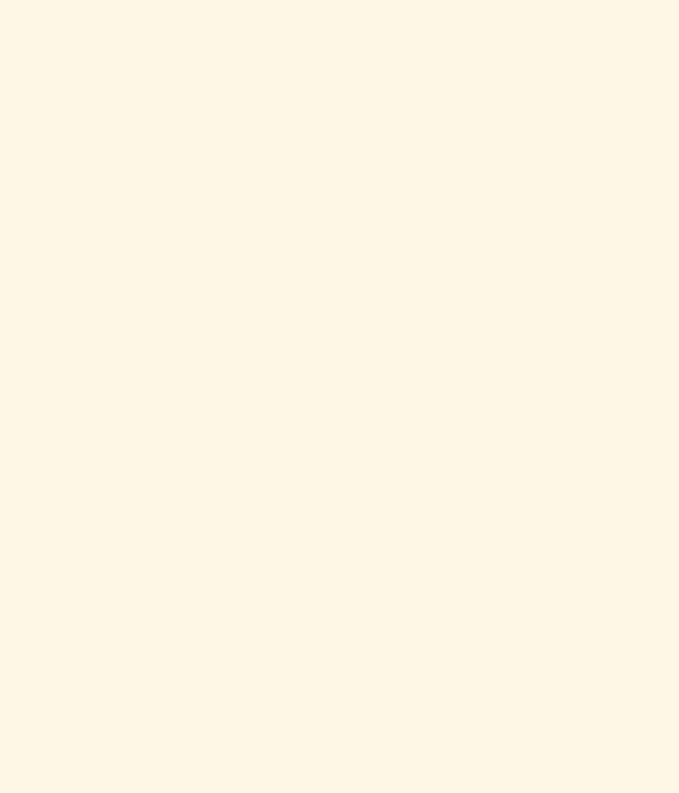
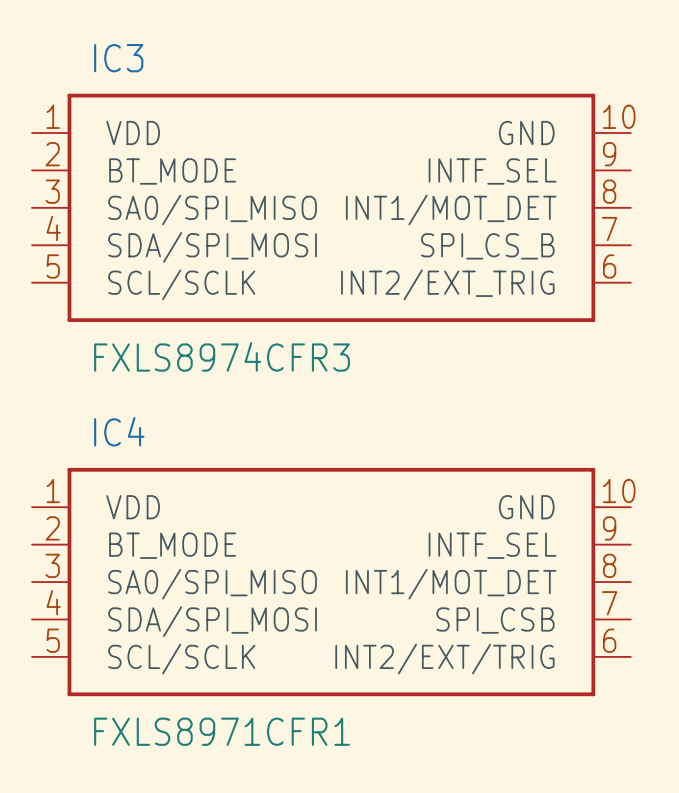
IC3: none -> FXLS8974CFR3 (331, 207)
IC4: none -> FXLS8971CFR1 (331, 582)

